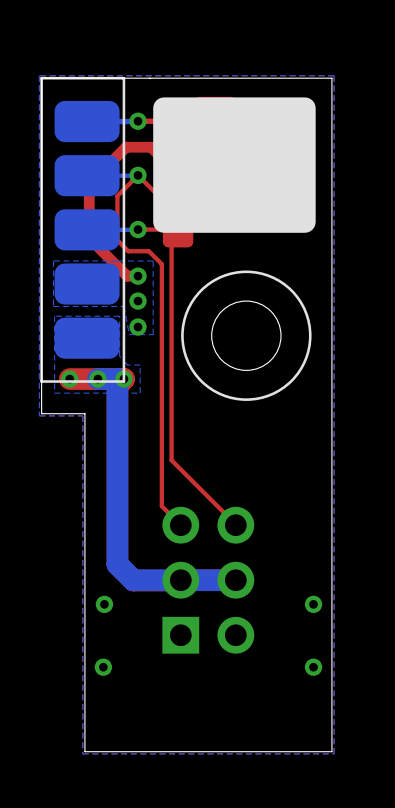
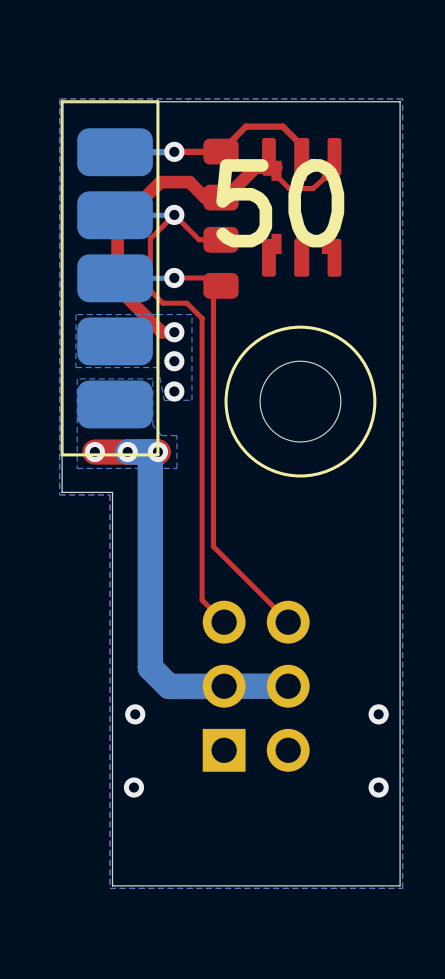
drawing: [153, 97, 316, 233] -> none

